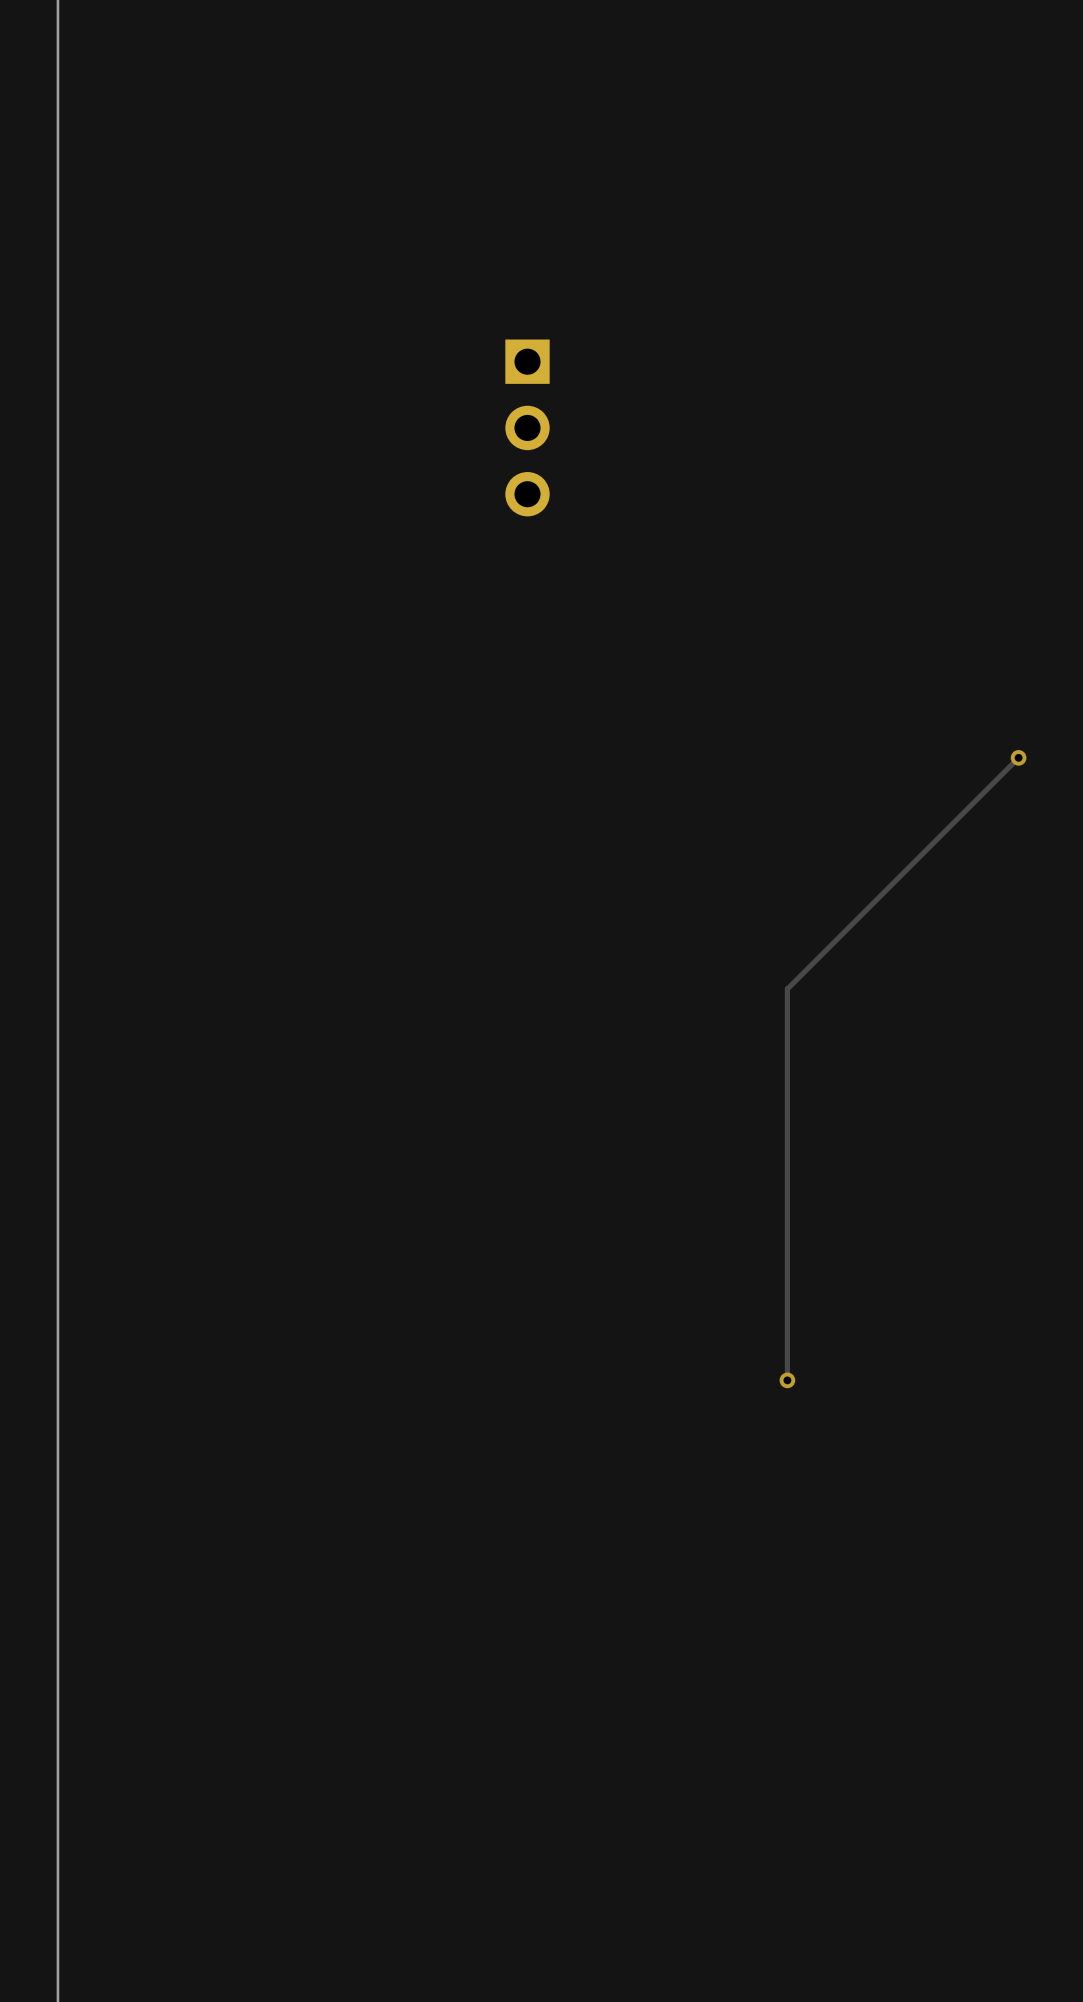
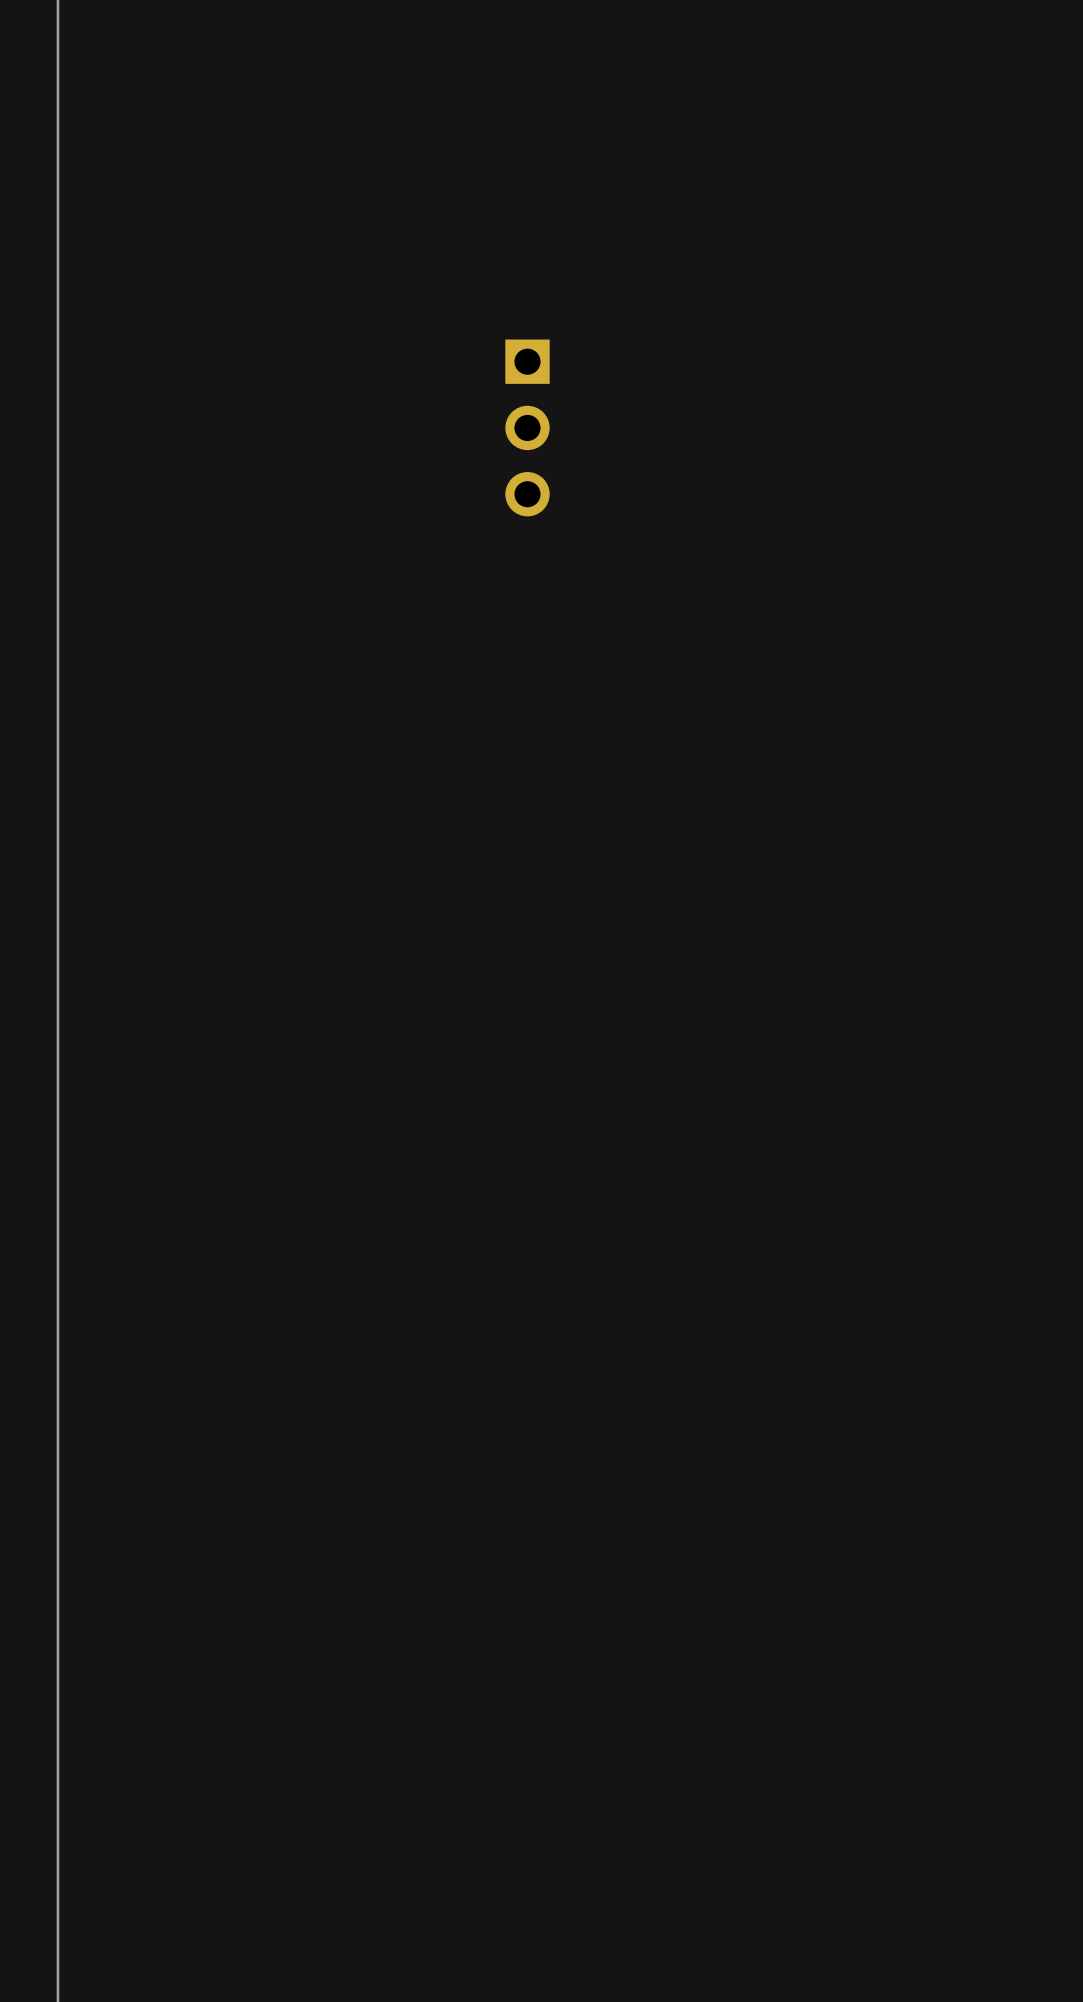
track: (1018, 757) (787, 989) (787, 1380) -> none
via: (1018, 757) -> none
via: (787, 1380) -> none

